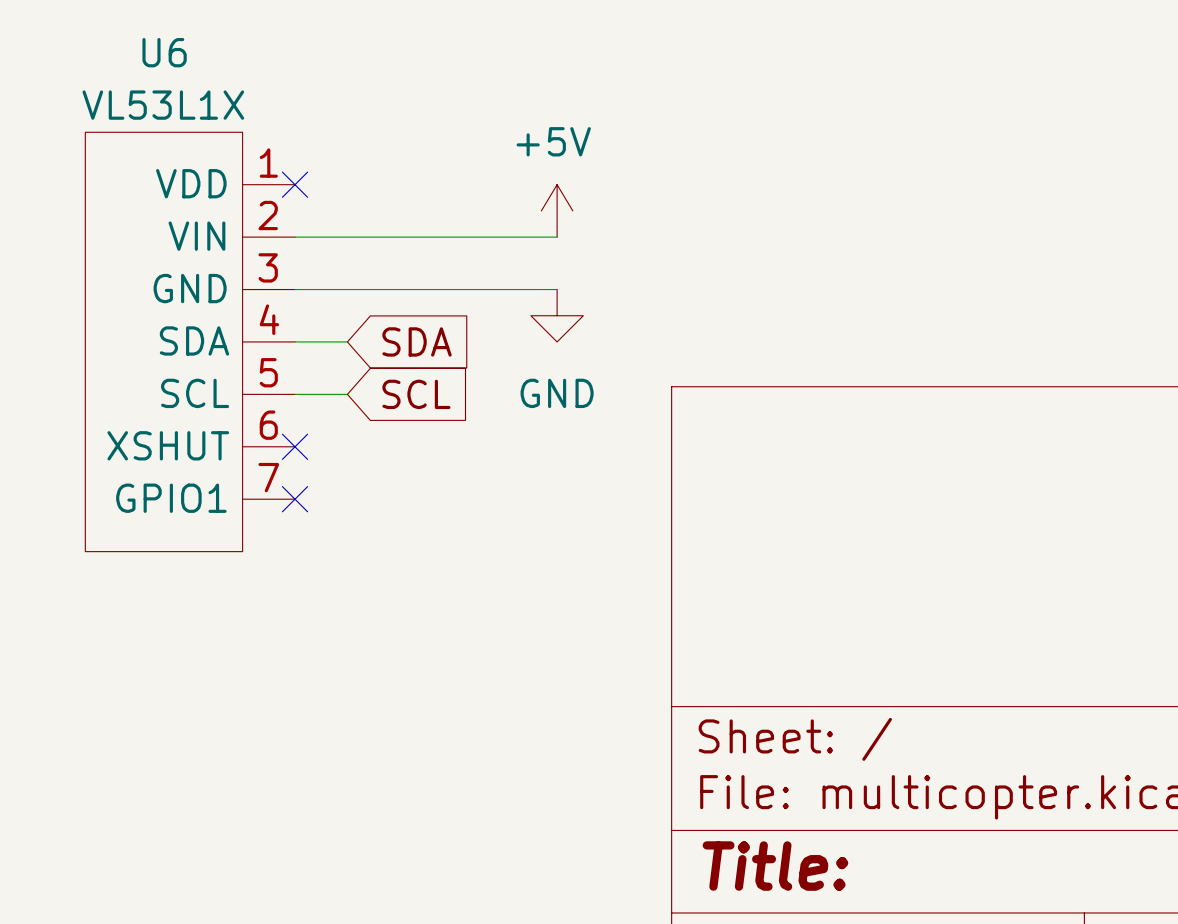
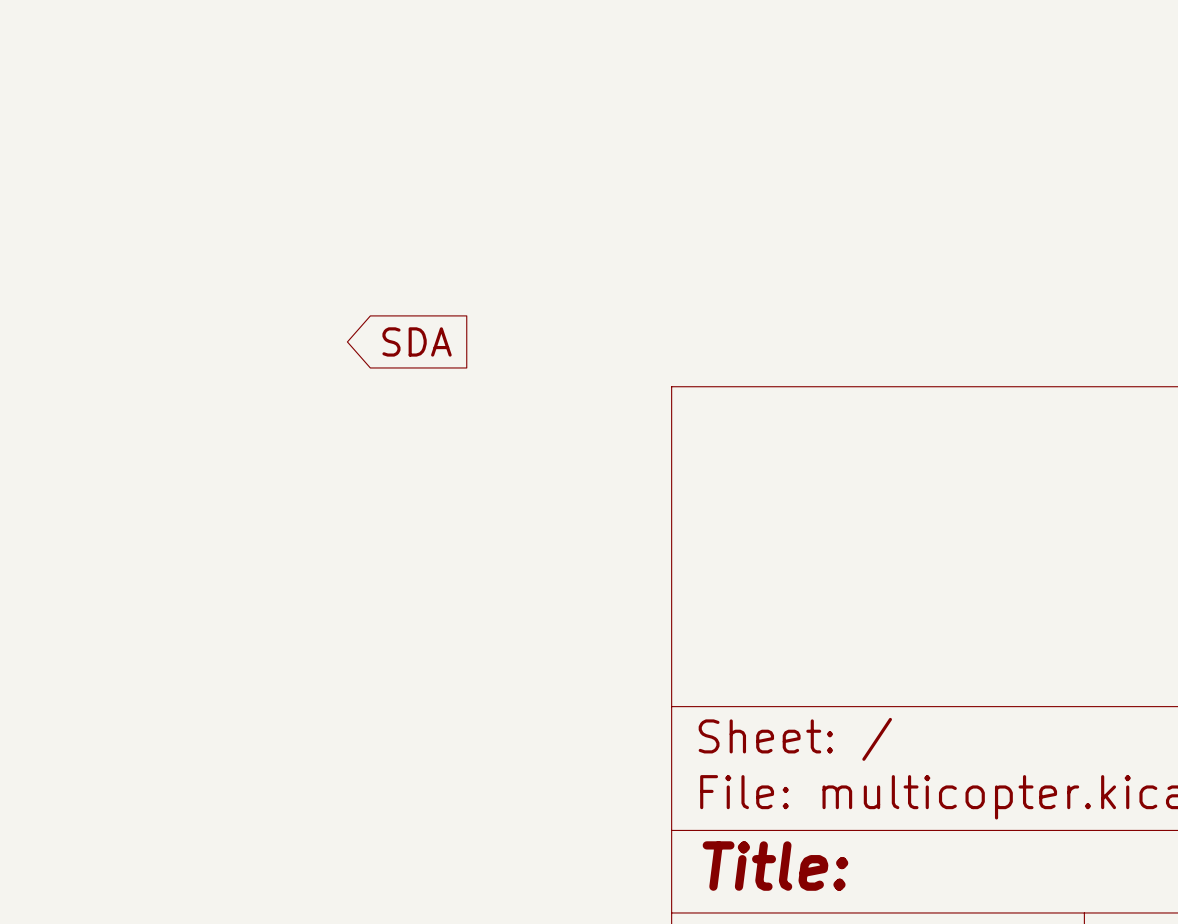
no-connect mark: (295, 184) -> none
power symbol: +5V (557, 210) -> none
wire: (295, 237) (557, 237) -> none
wire: (295, 289) (557, 289) -> none
power symbol: GND (557, 315) -> none
U6: VL53L1X (190, 341) -> none
wire: (295, 341) (347, 341) -> none
wire: (295, 394) (347, 394) -> none
global label: SCL (416, 394) -> none
no-connect mark: (295, 446) -> none
no-connect mark: (295, 499) -> none

